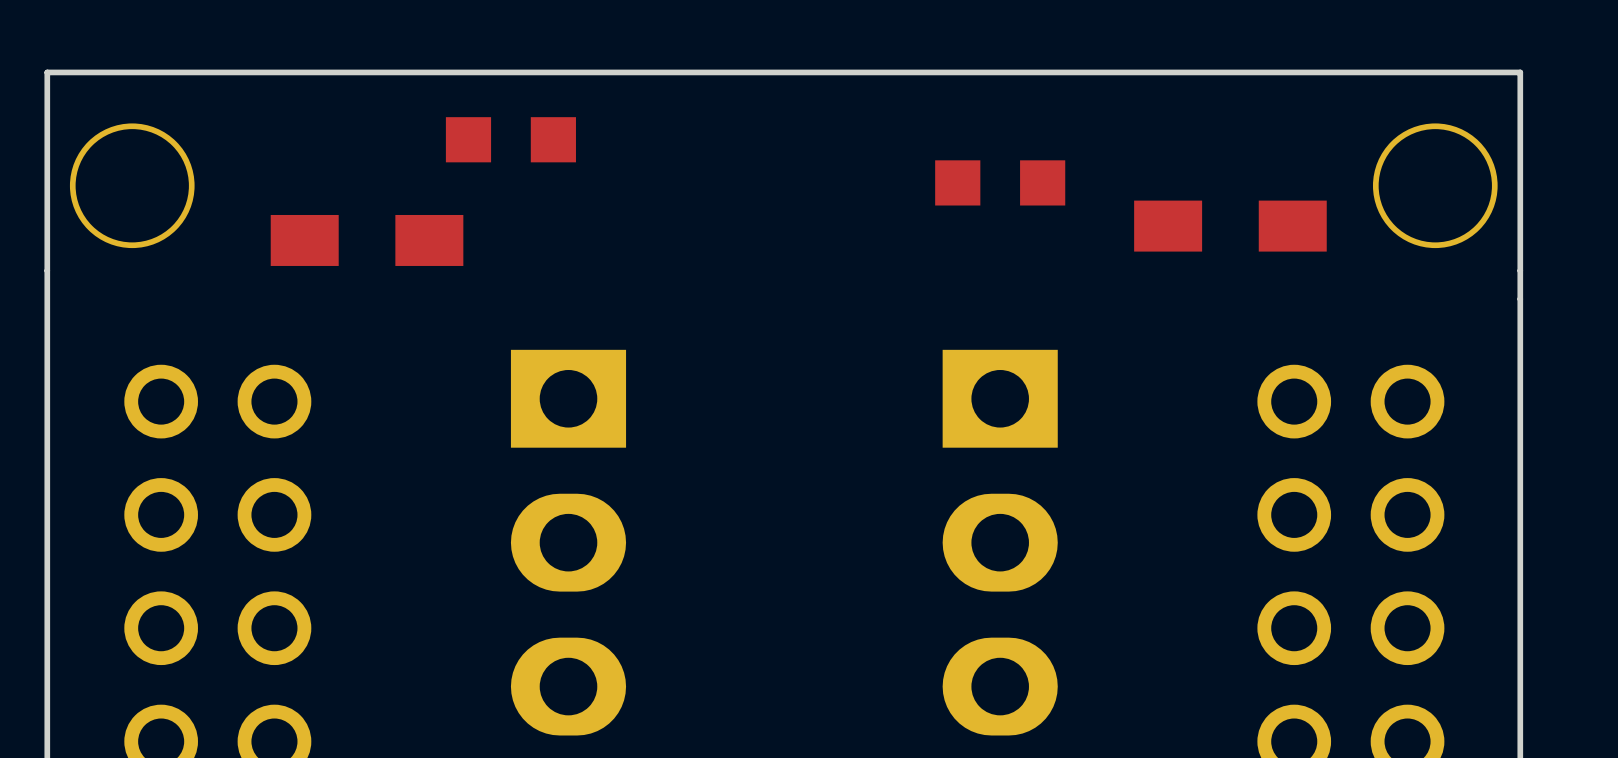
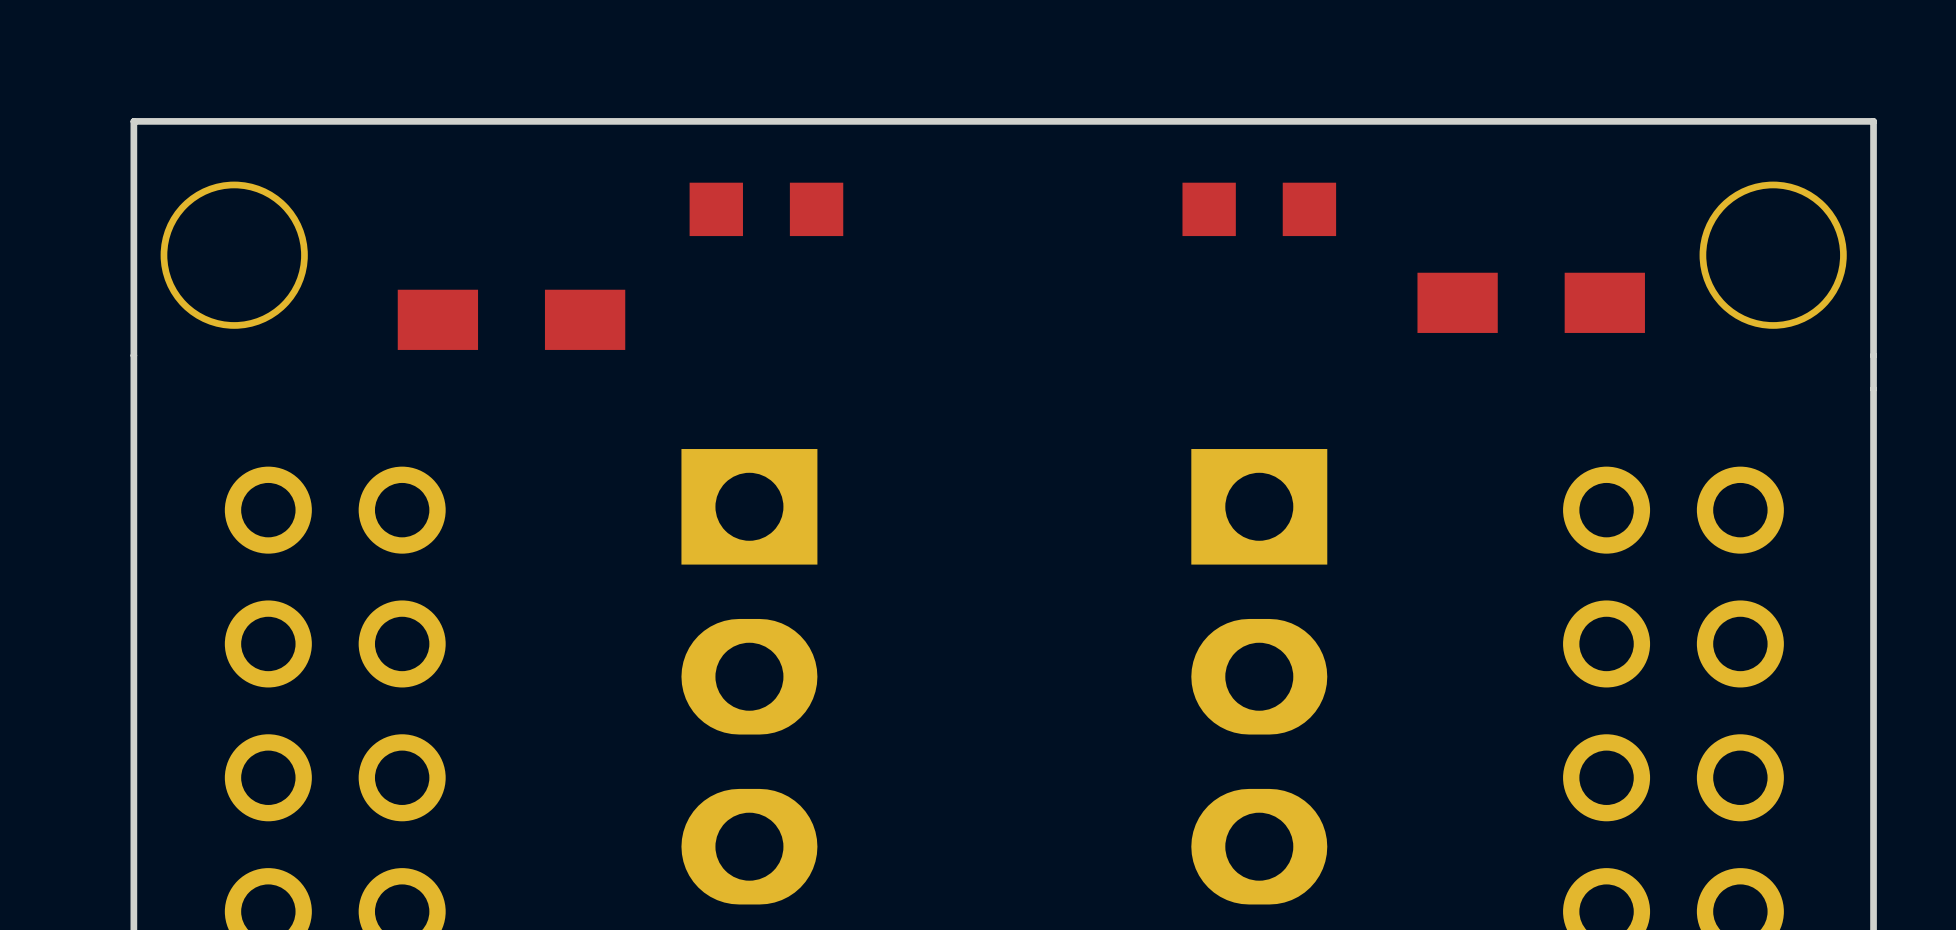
part position: (510, 139) -> (766, 209)
part position: (1000, 182) -> (1259, 209)

